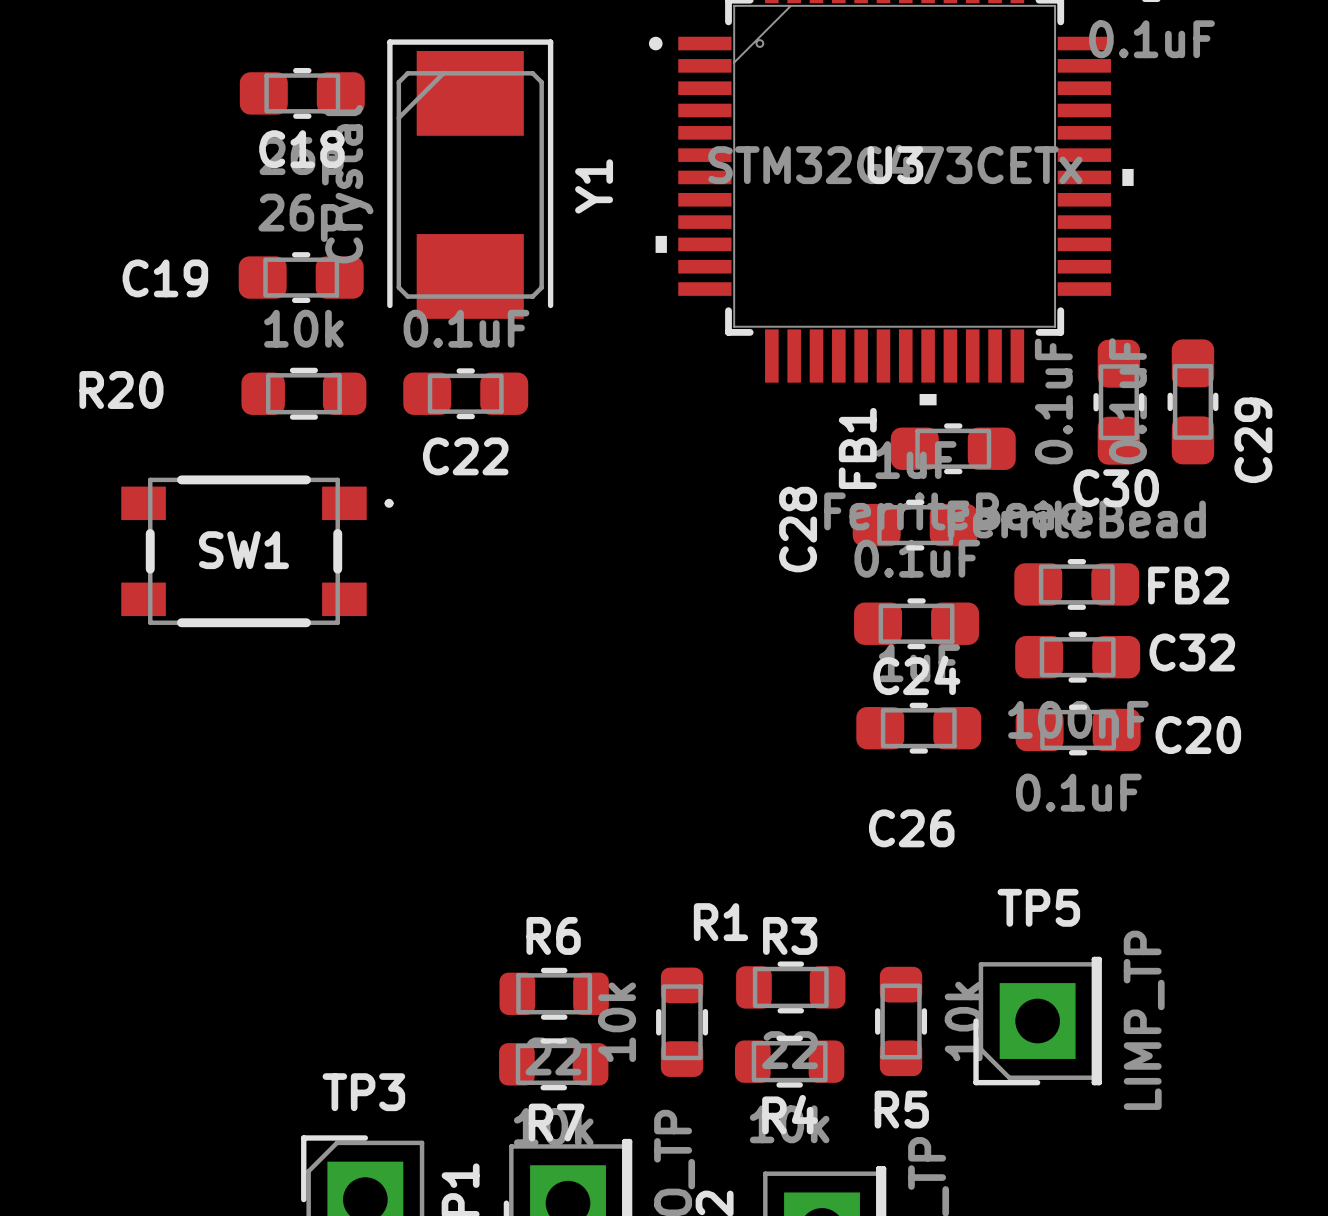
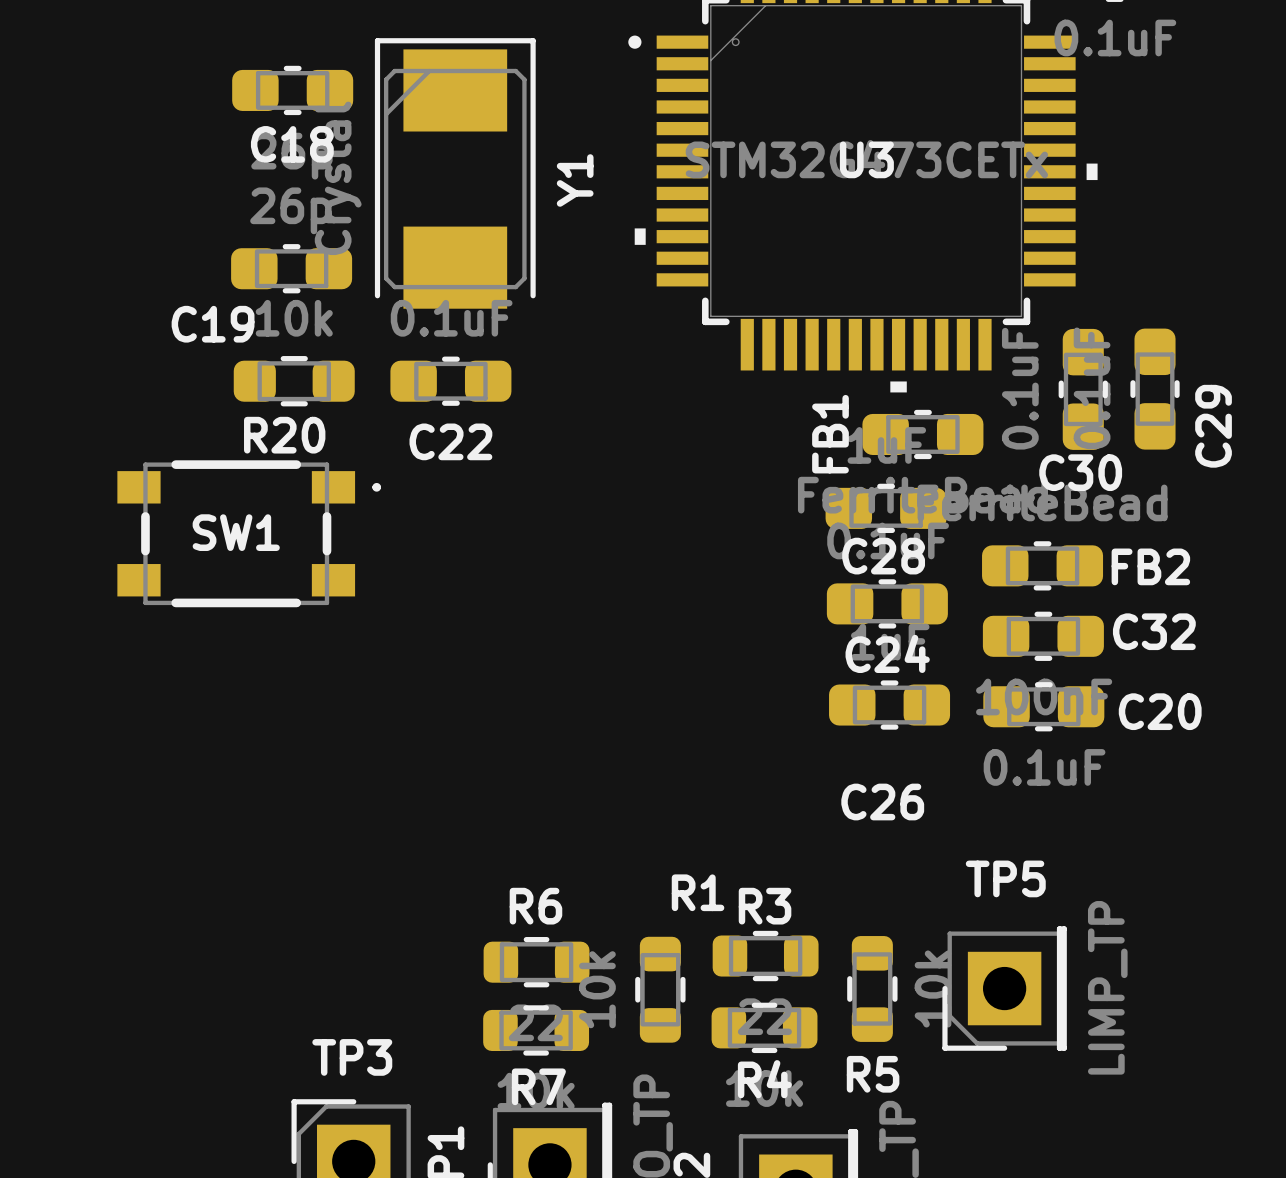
C19 name position: C19 (165, 278) -> C19 (213, 324)
R20 name position: R20 (121, 390) -> R20 (284, 435)
C28 name rotation: 0° (798, 529) -> 90° clockwise (883, 556)
C28 name position: C28 (798, 529) -> C28 (883, 556)

